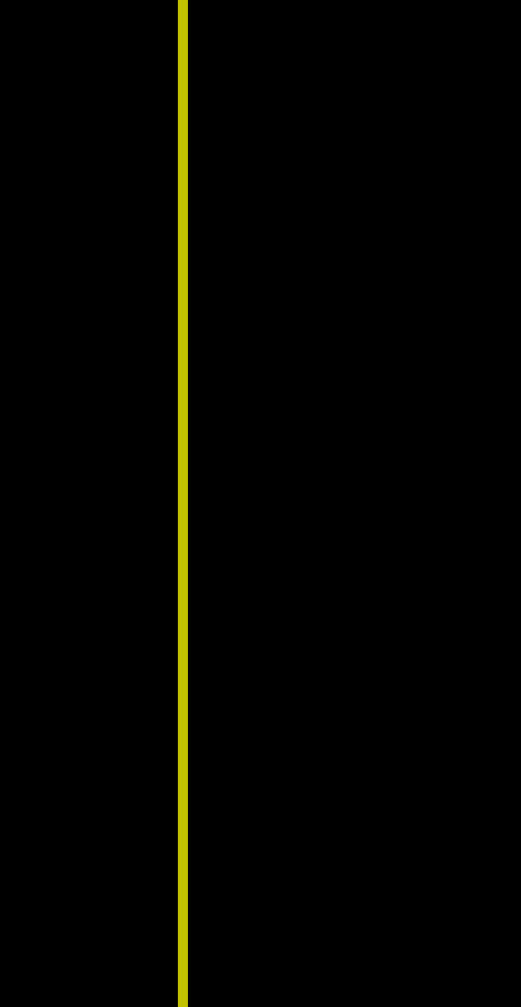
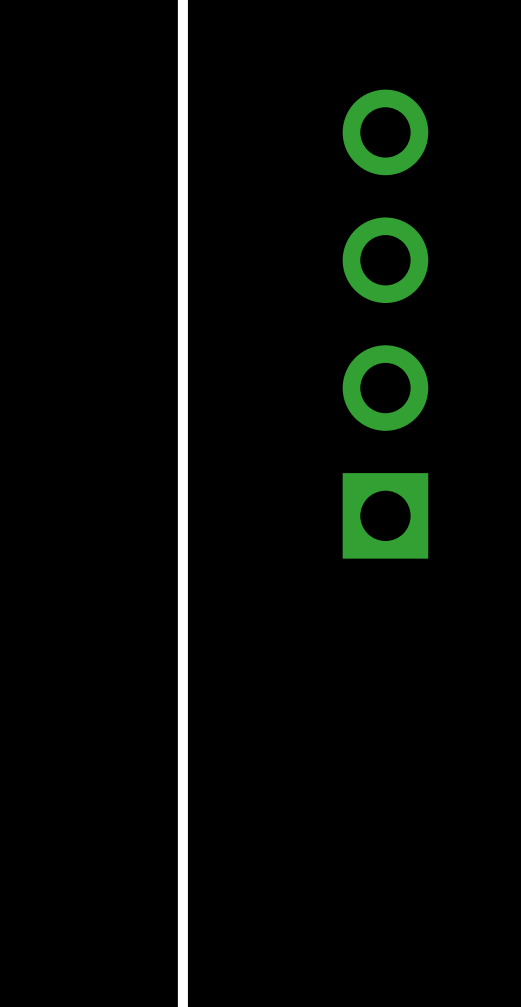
part: none -> (385, 324)

